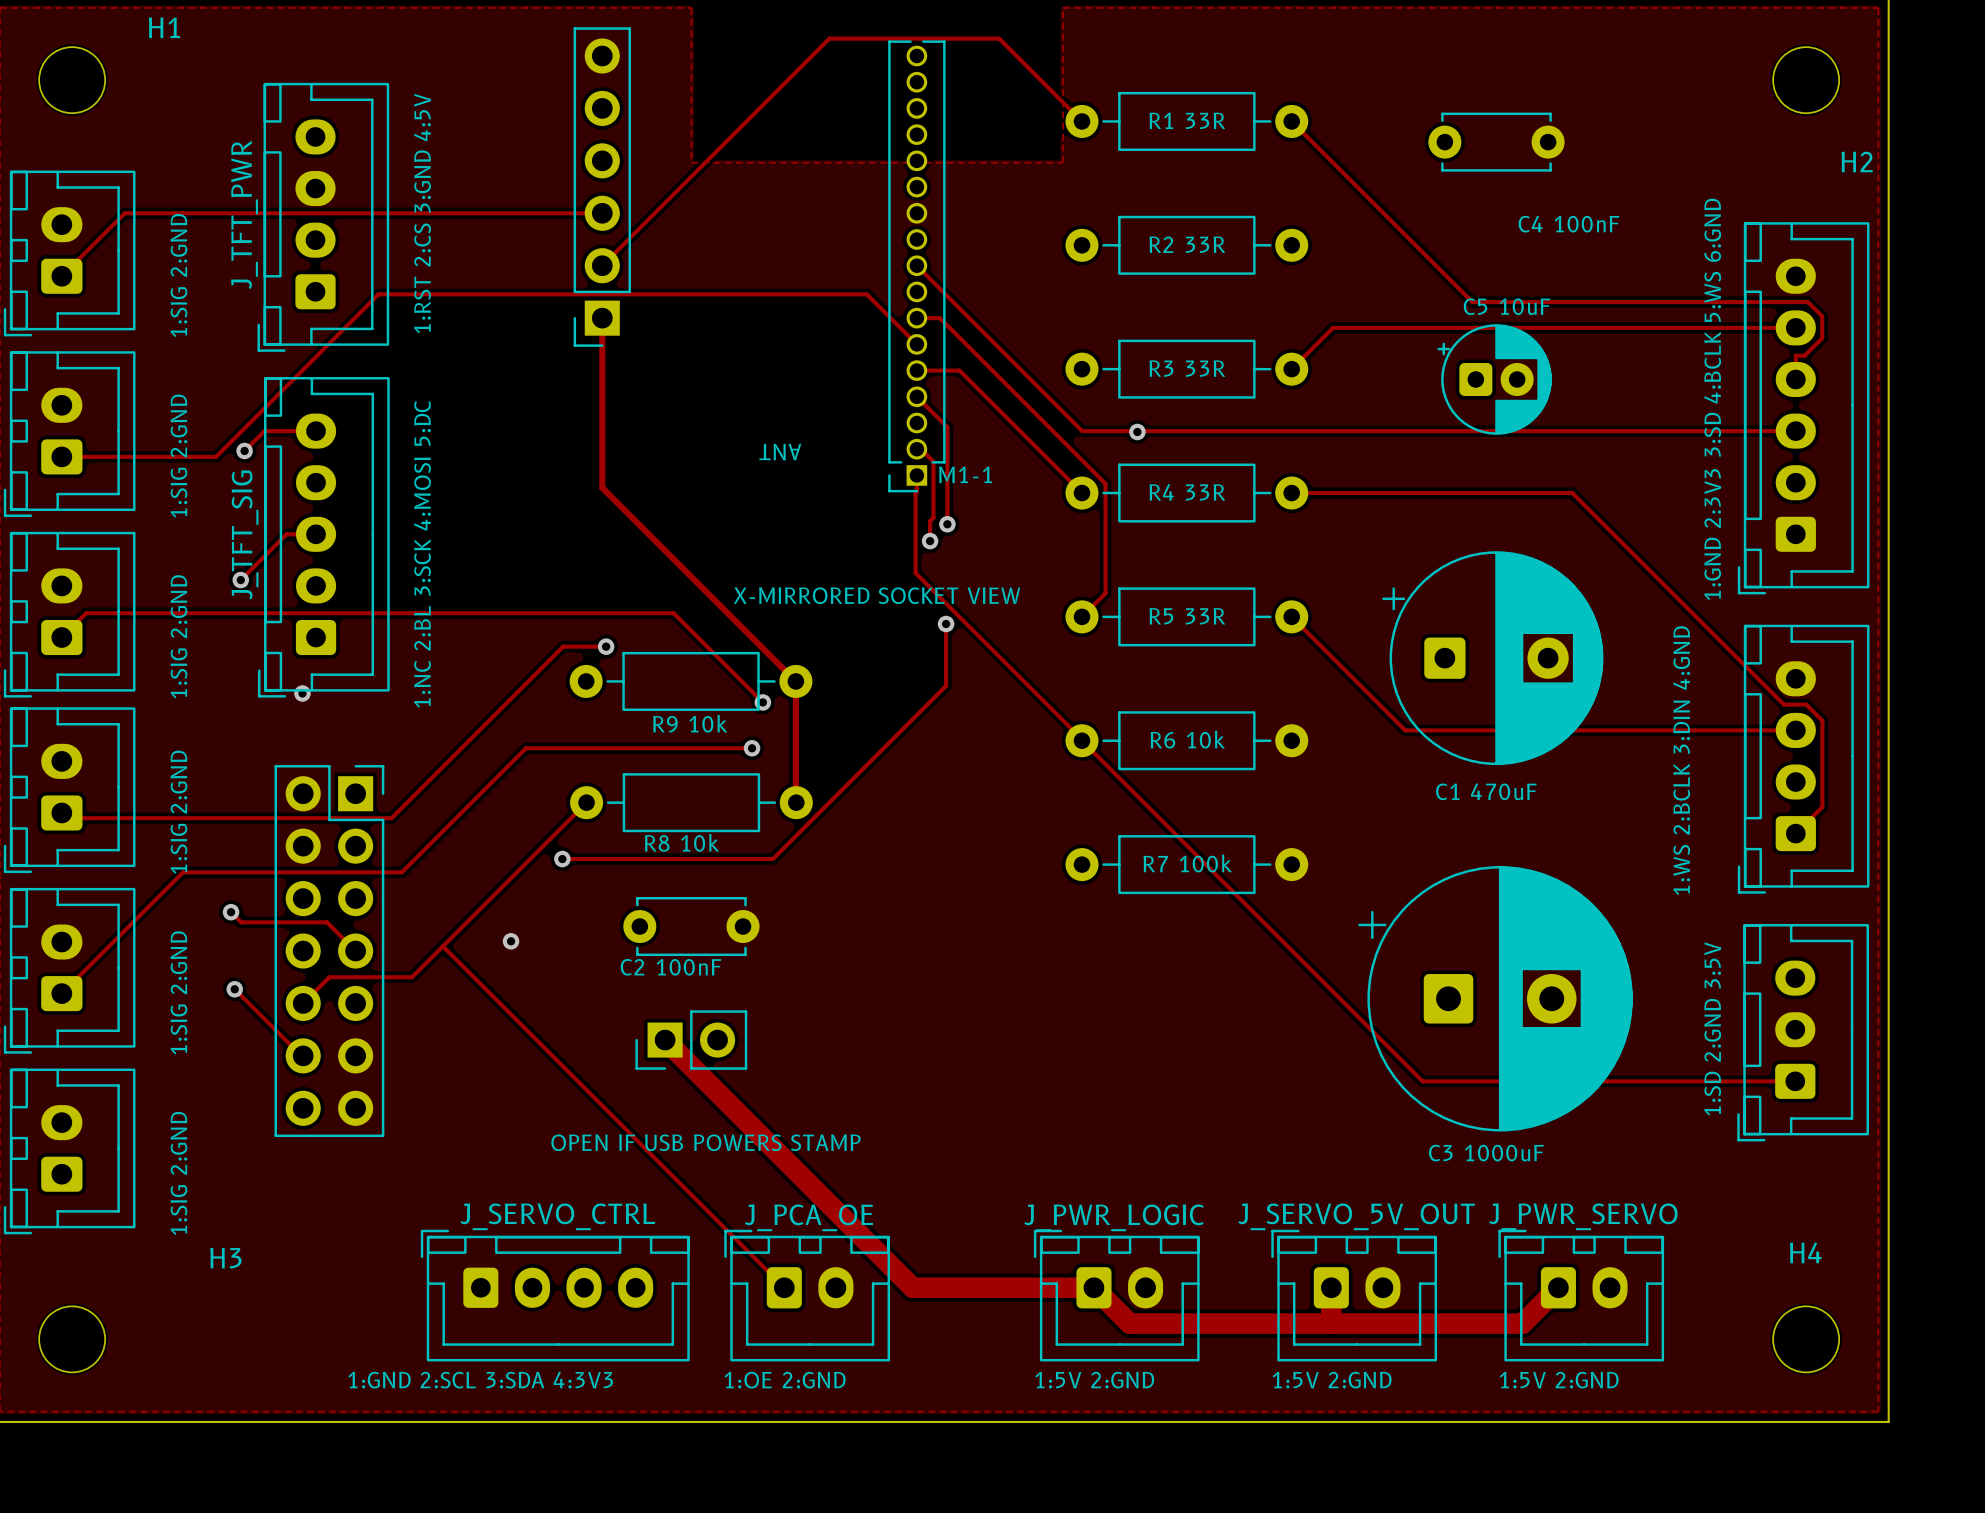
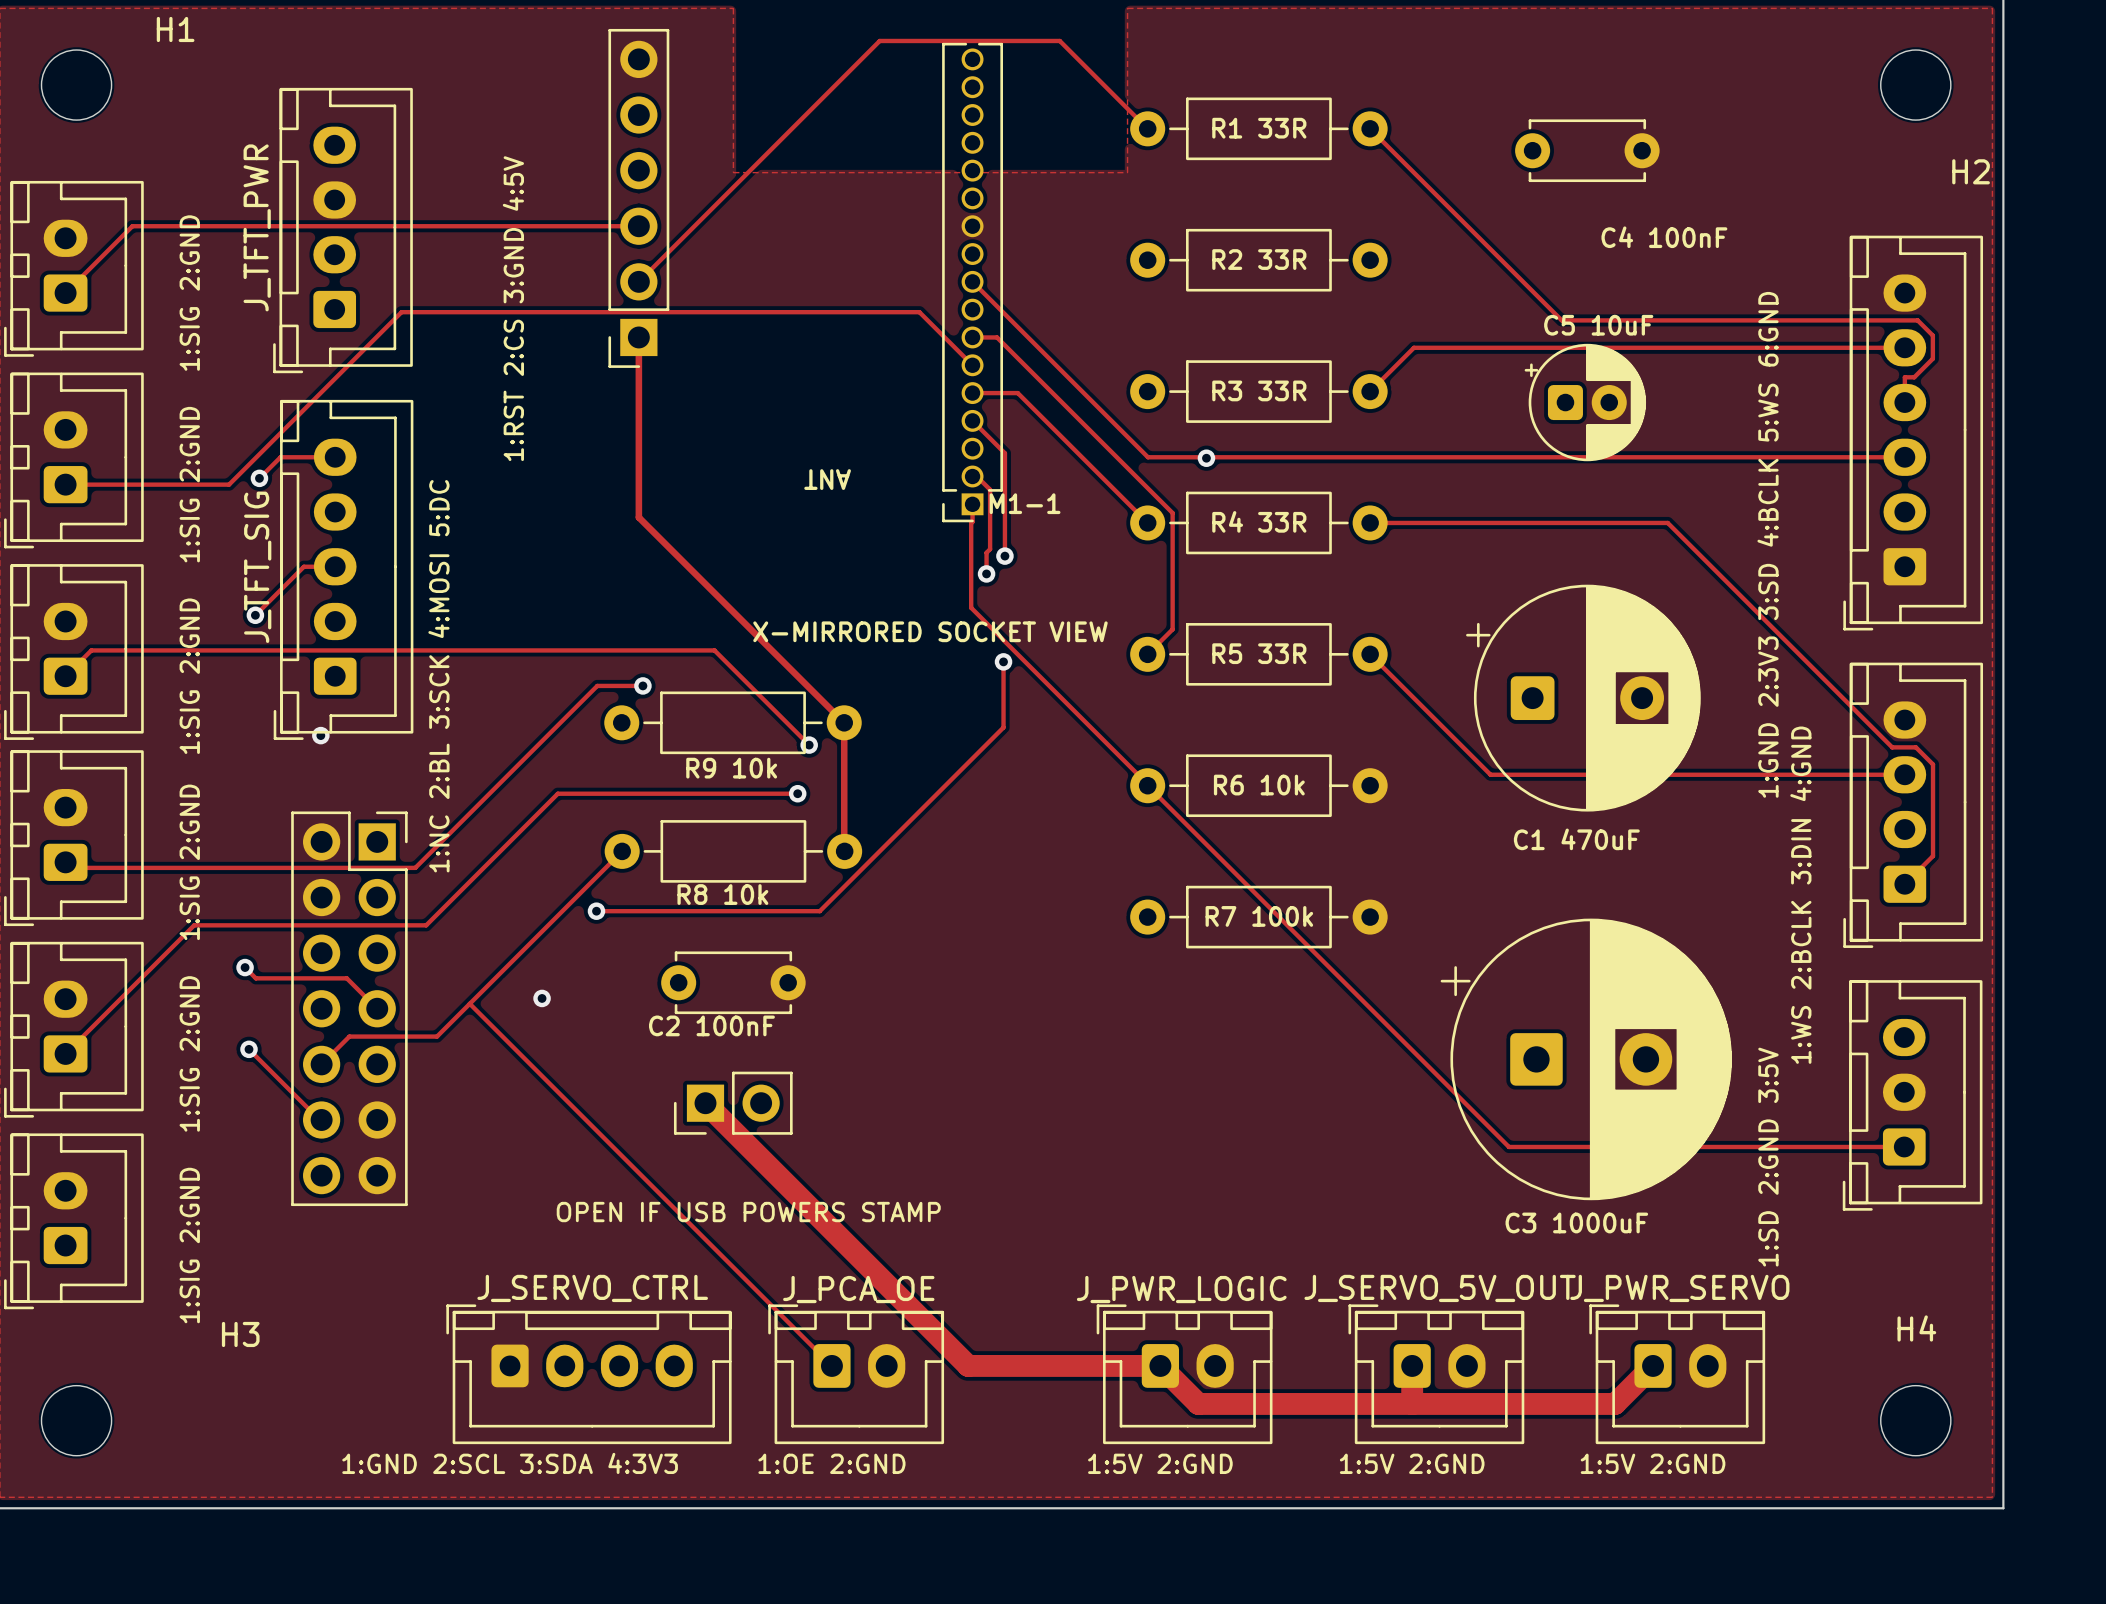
text position: 1:RST 2:CS 3:GND 4:5V (422, 213) -> 1:RST 2:CS 3:GND 4:5V (513, 308)
text position: 1:GND 2:3V3 3:SD 4:BCLK 5:WS 6:GND (1712, 399) -> 1:GND 2:3V3 3:SD 4:BCLK 5:WS 6:GND (1768, 544)
text position: 1:NC 2:BL 3:SCK 4:MOSI 5:DC (422, 554) -> 1:NC 2:BL 3:SCK 4:MOSI 5:DC (438, 676)
text position: 1:WS 2:BCLK 3:DIN 4:GND (1681, 760) -> 1:WS 2:BCLK 3:DIN 4:GND (1800, 895)
text position: 1:SD 2:GND 3:5V (1712, 1028) -> 1:SD 2:GND 3:5V (1768, 1157)

